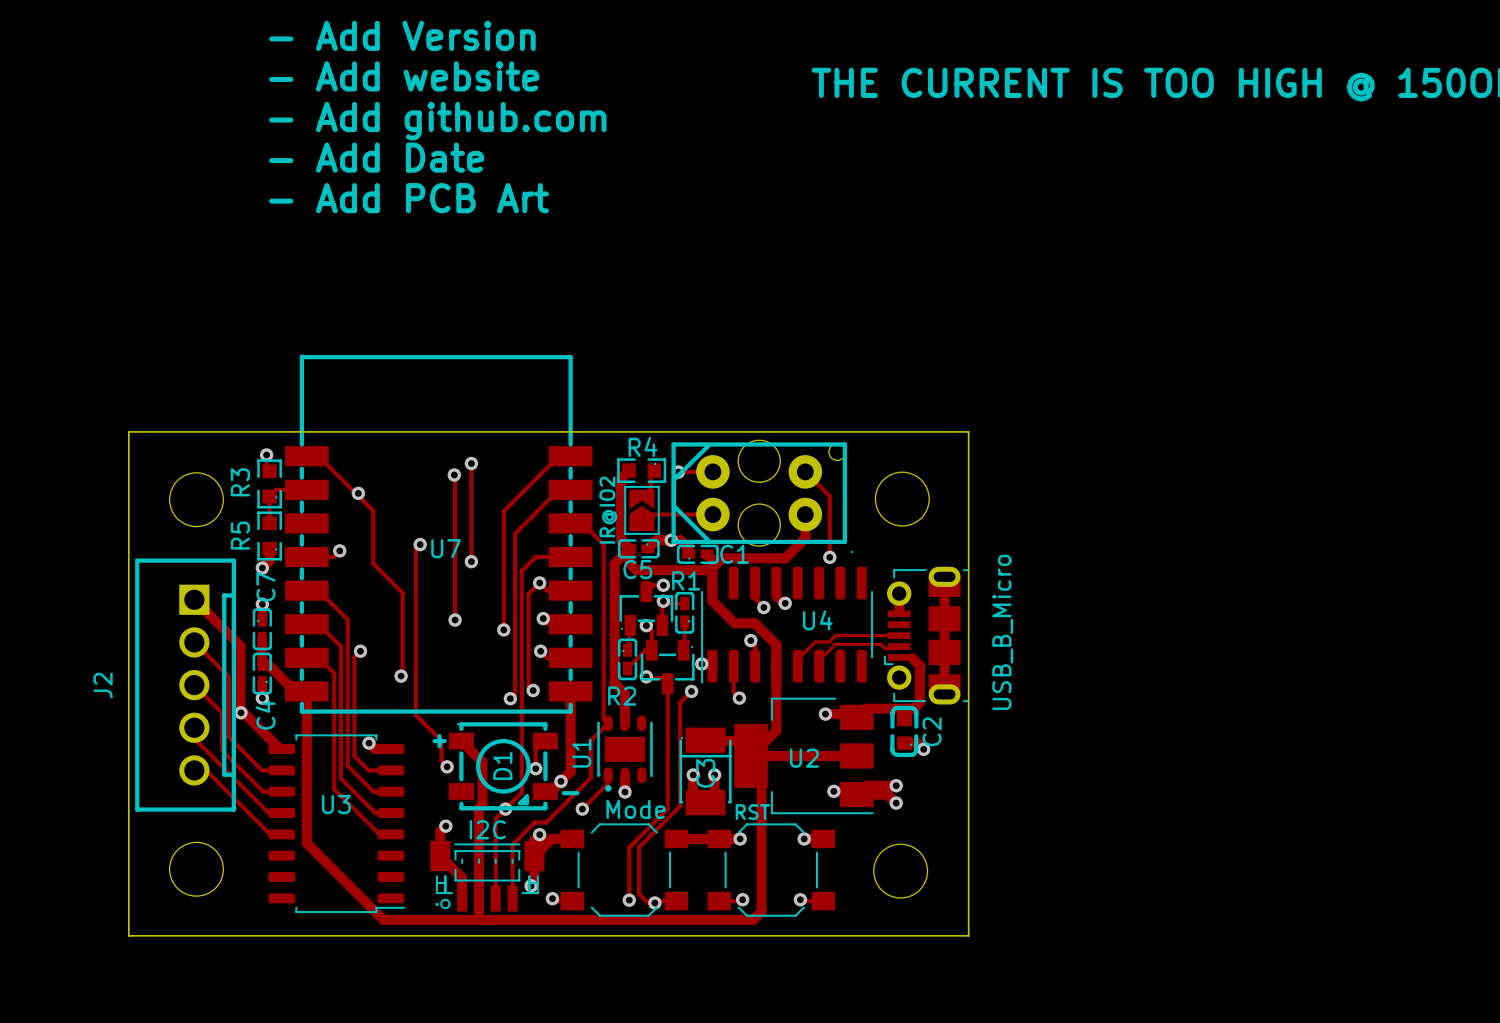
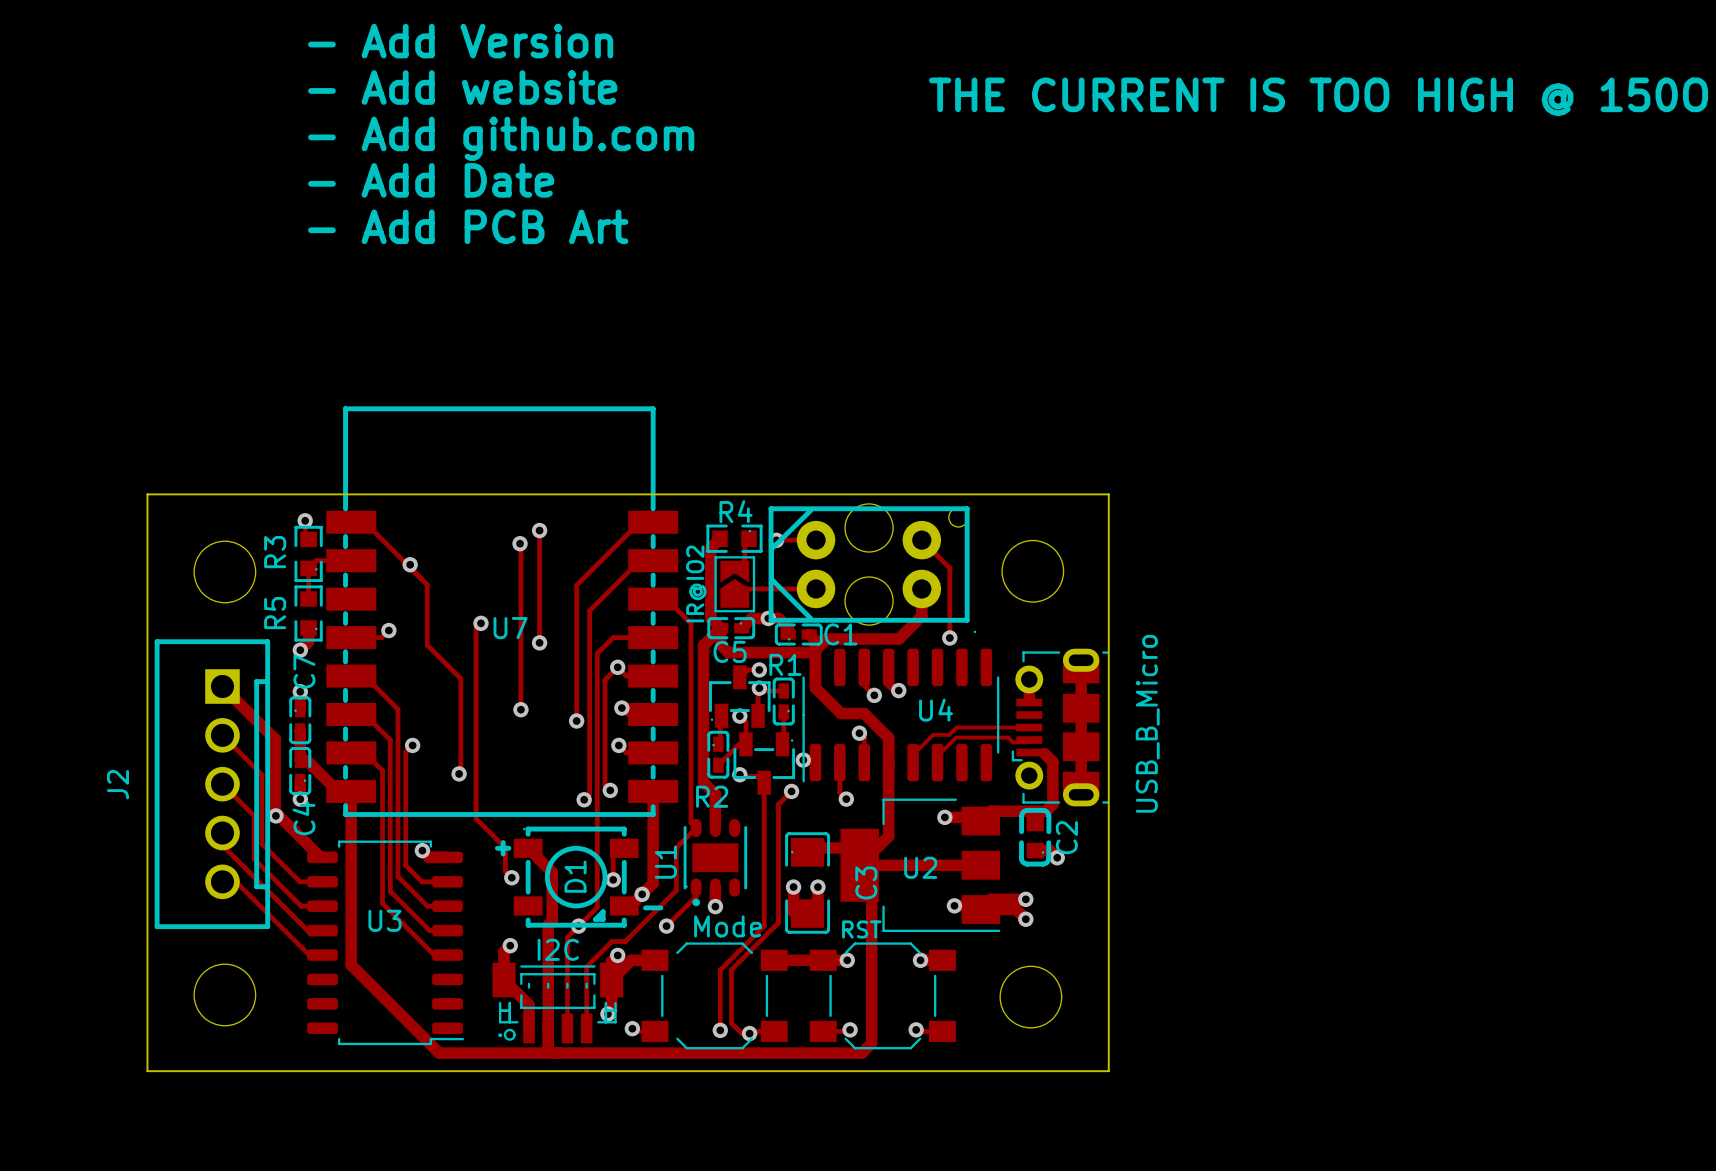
C3 footprint: [679, 727, 732, 816] -> [785, 832, 831, 934]
C3 name position: C3 (705, 773) -> C3 (866, 882)

